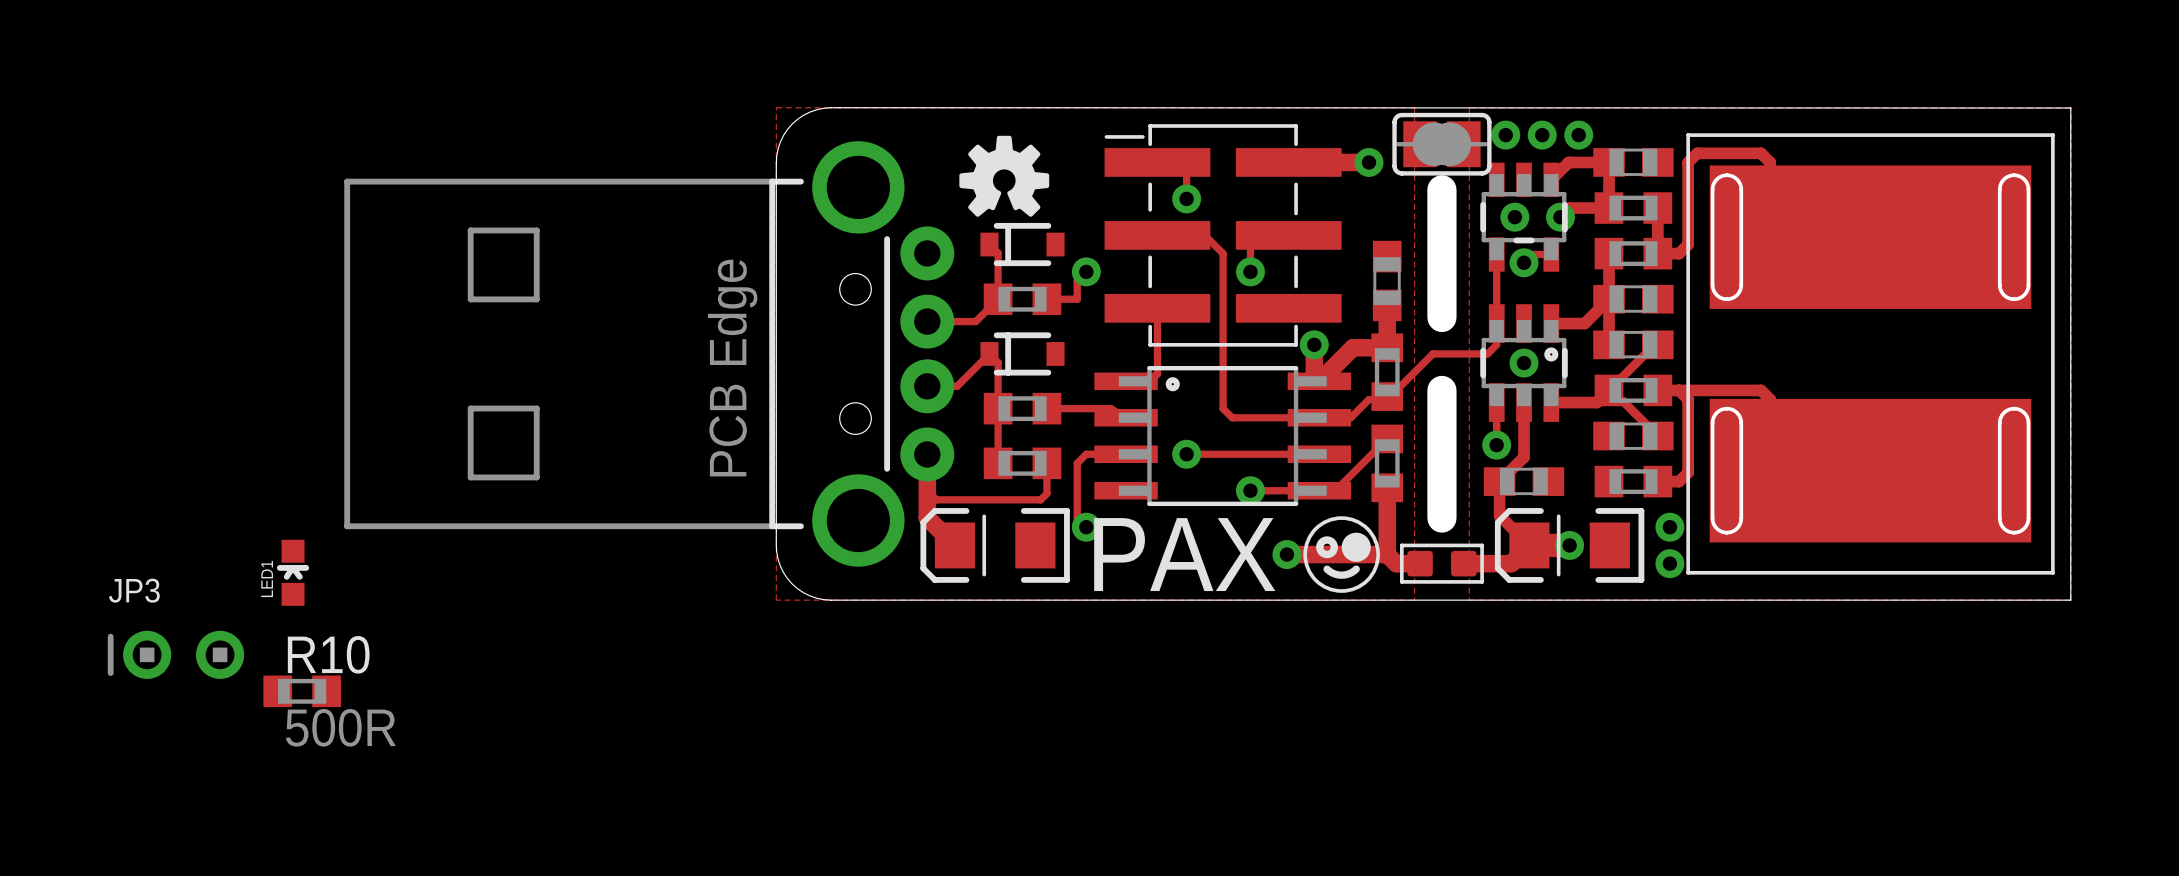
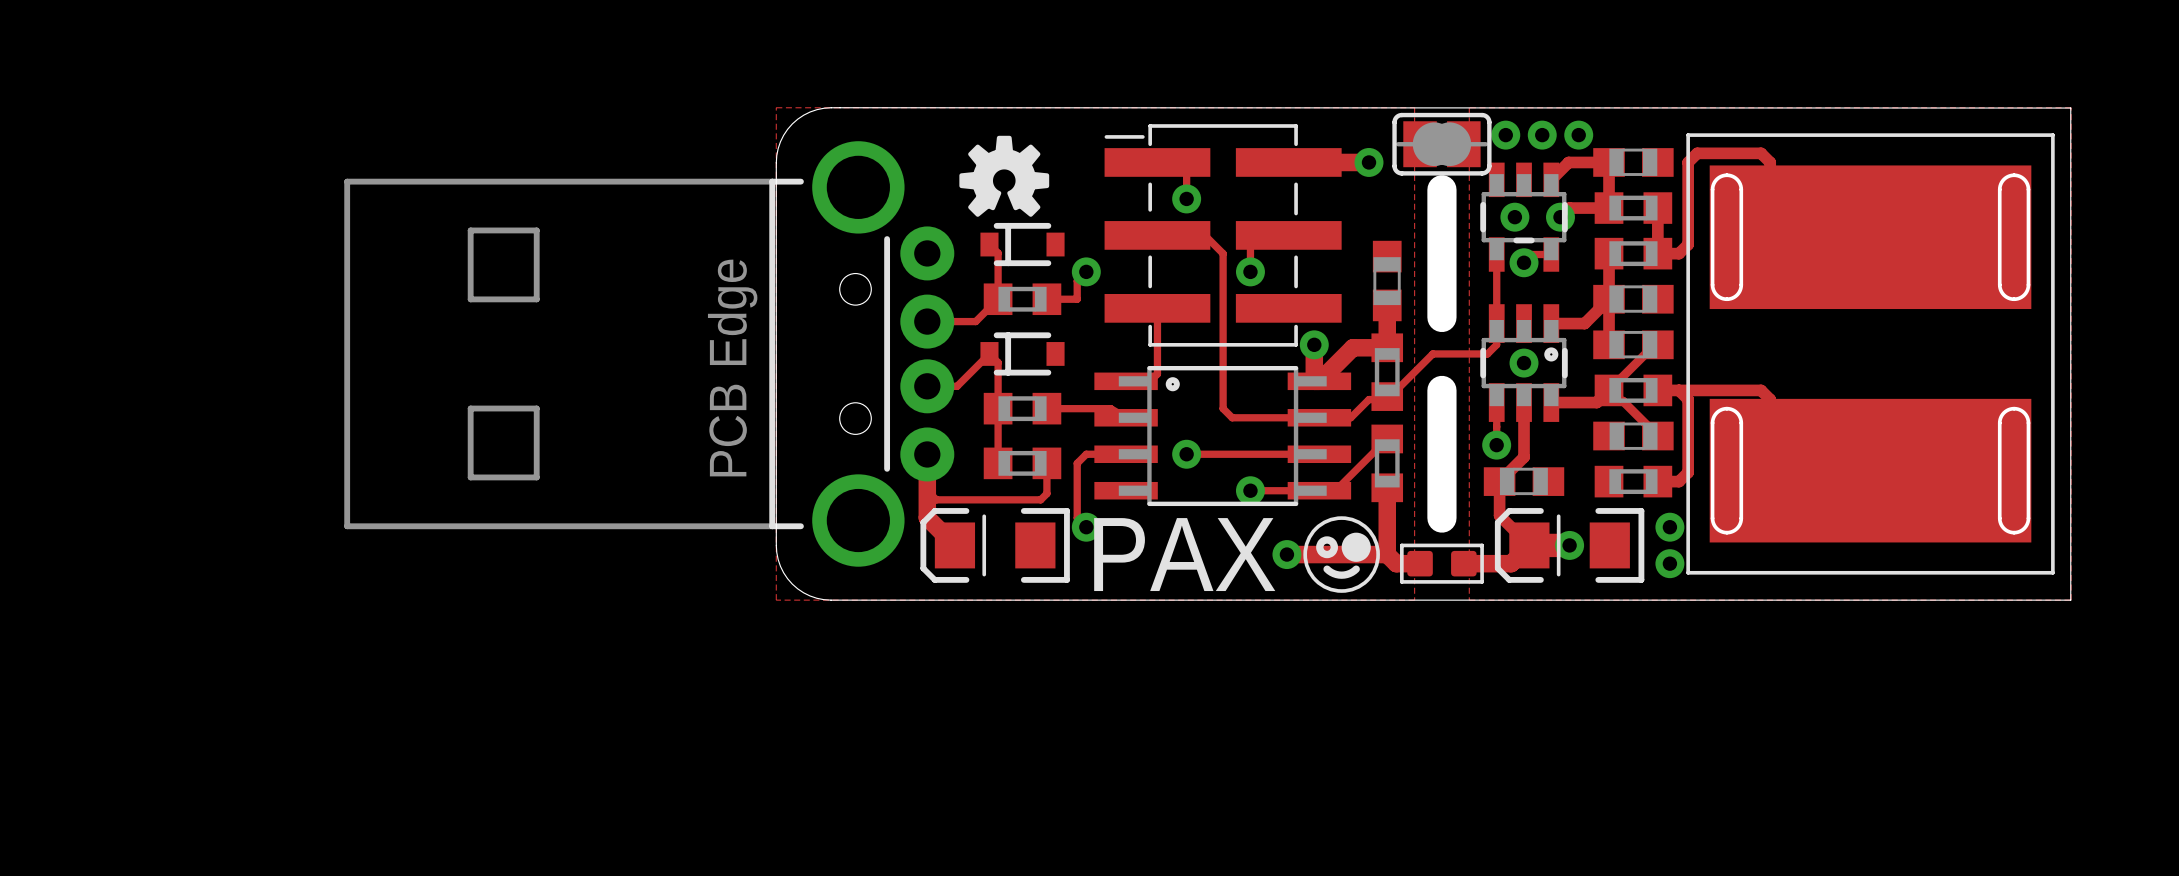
LED1: (293, 572) -> none
JP3: (175, 654) -> none
R10: 500R (302, 691) -> none

